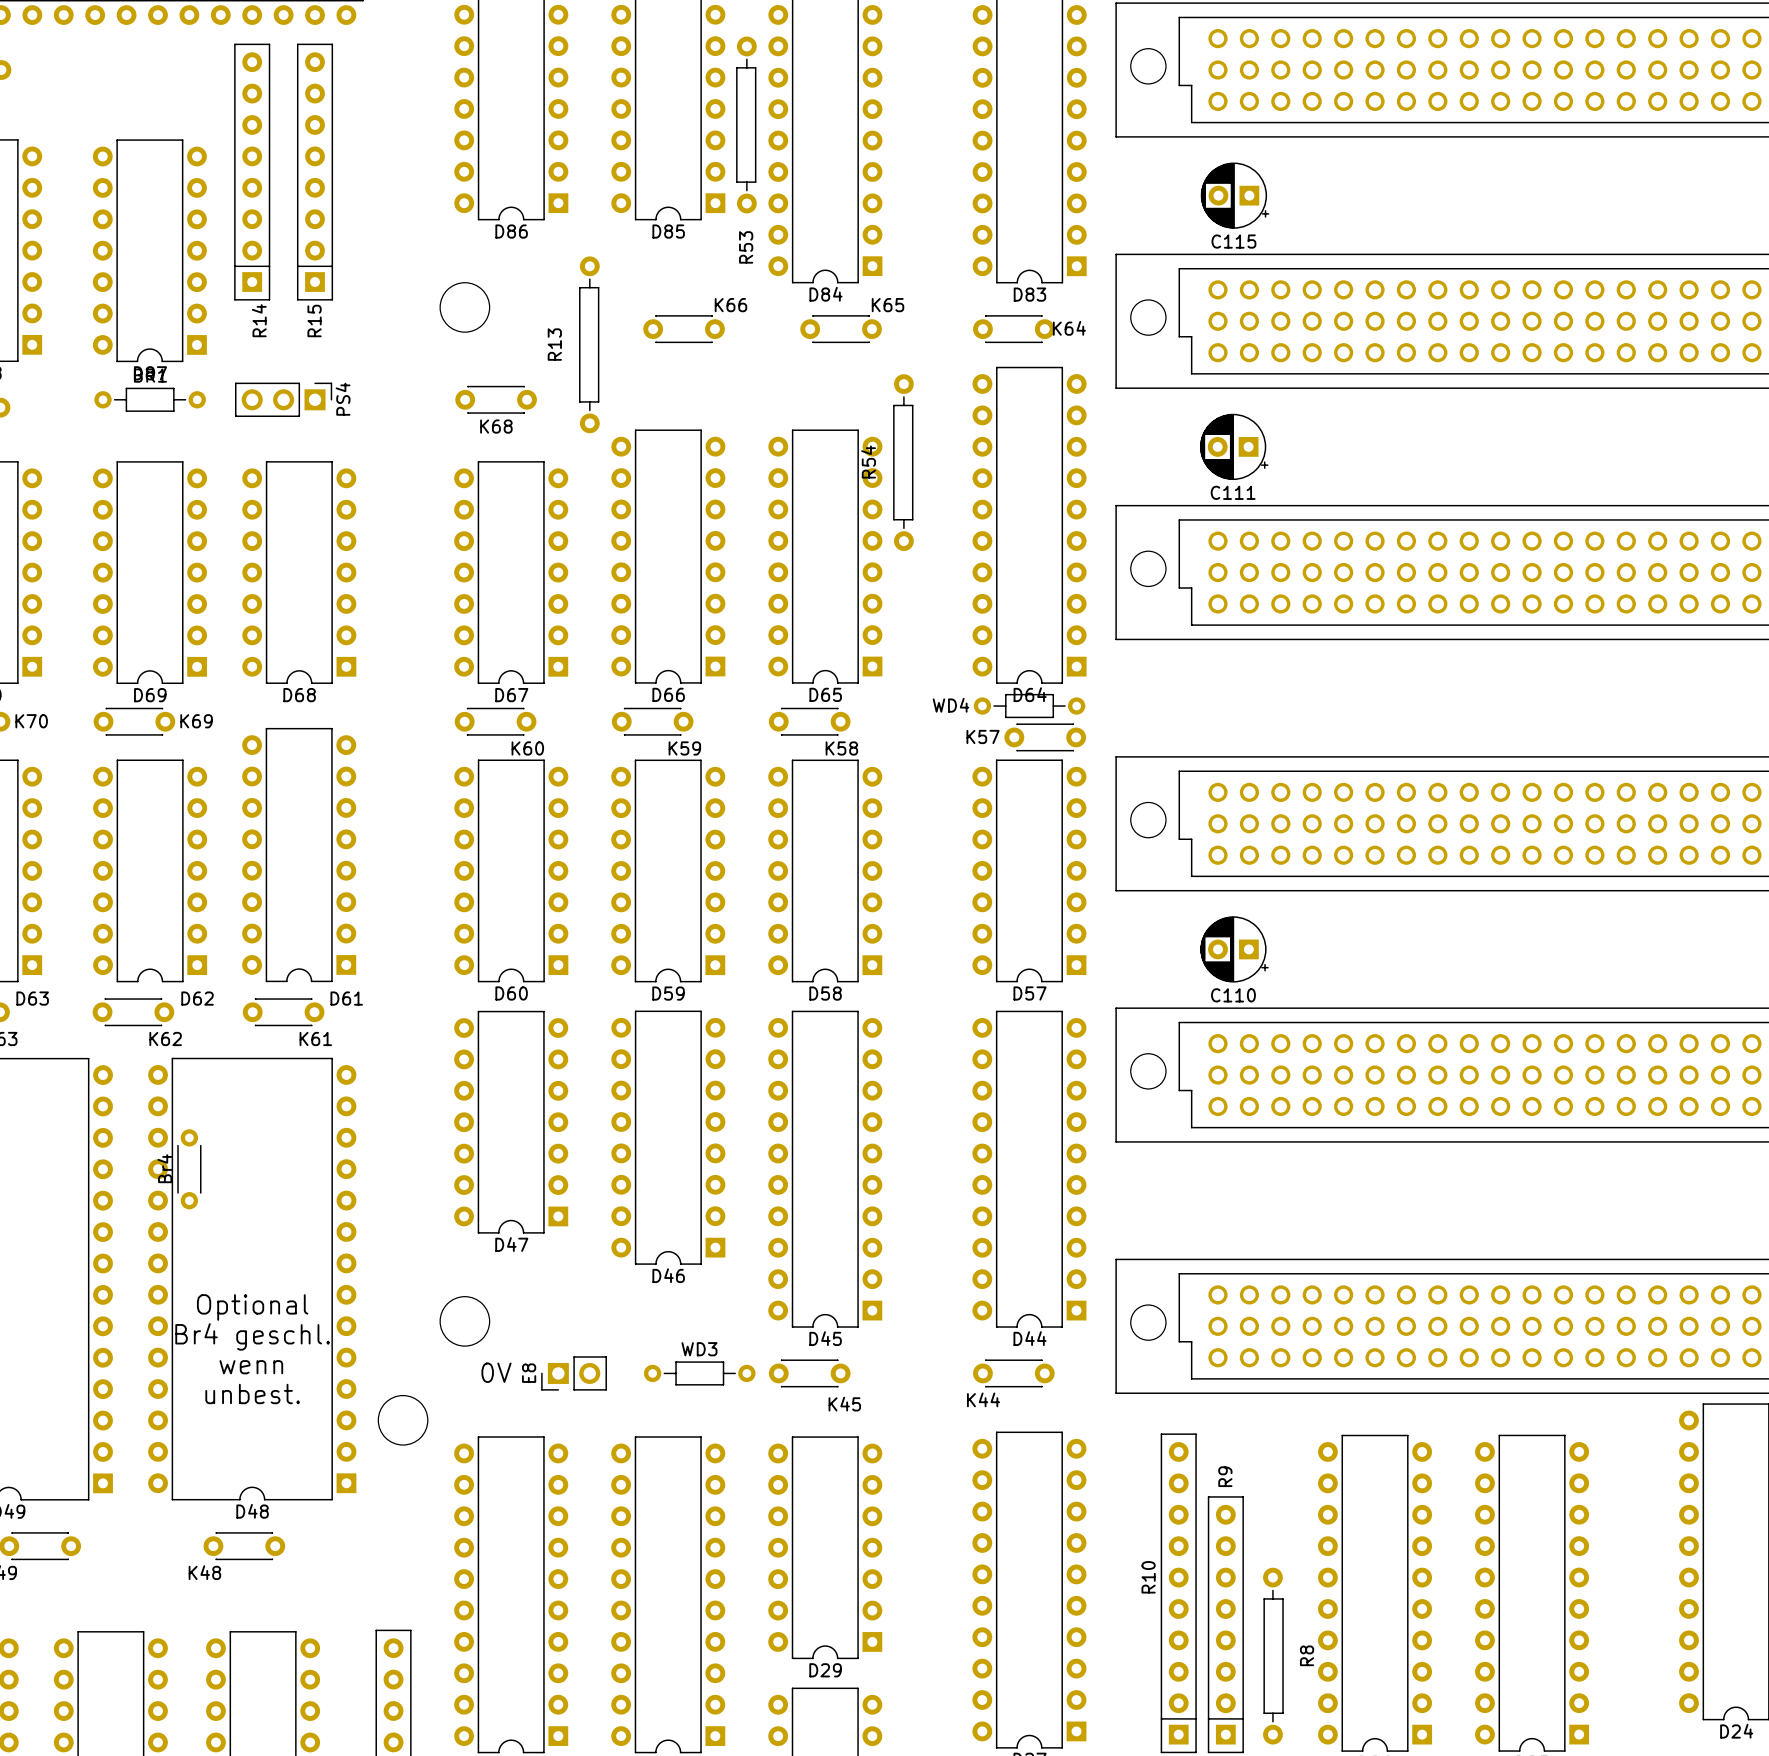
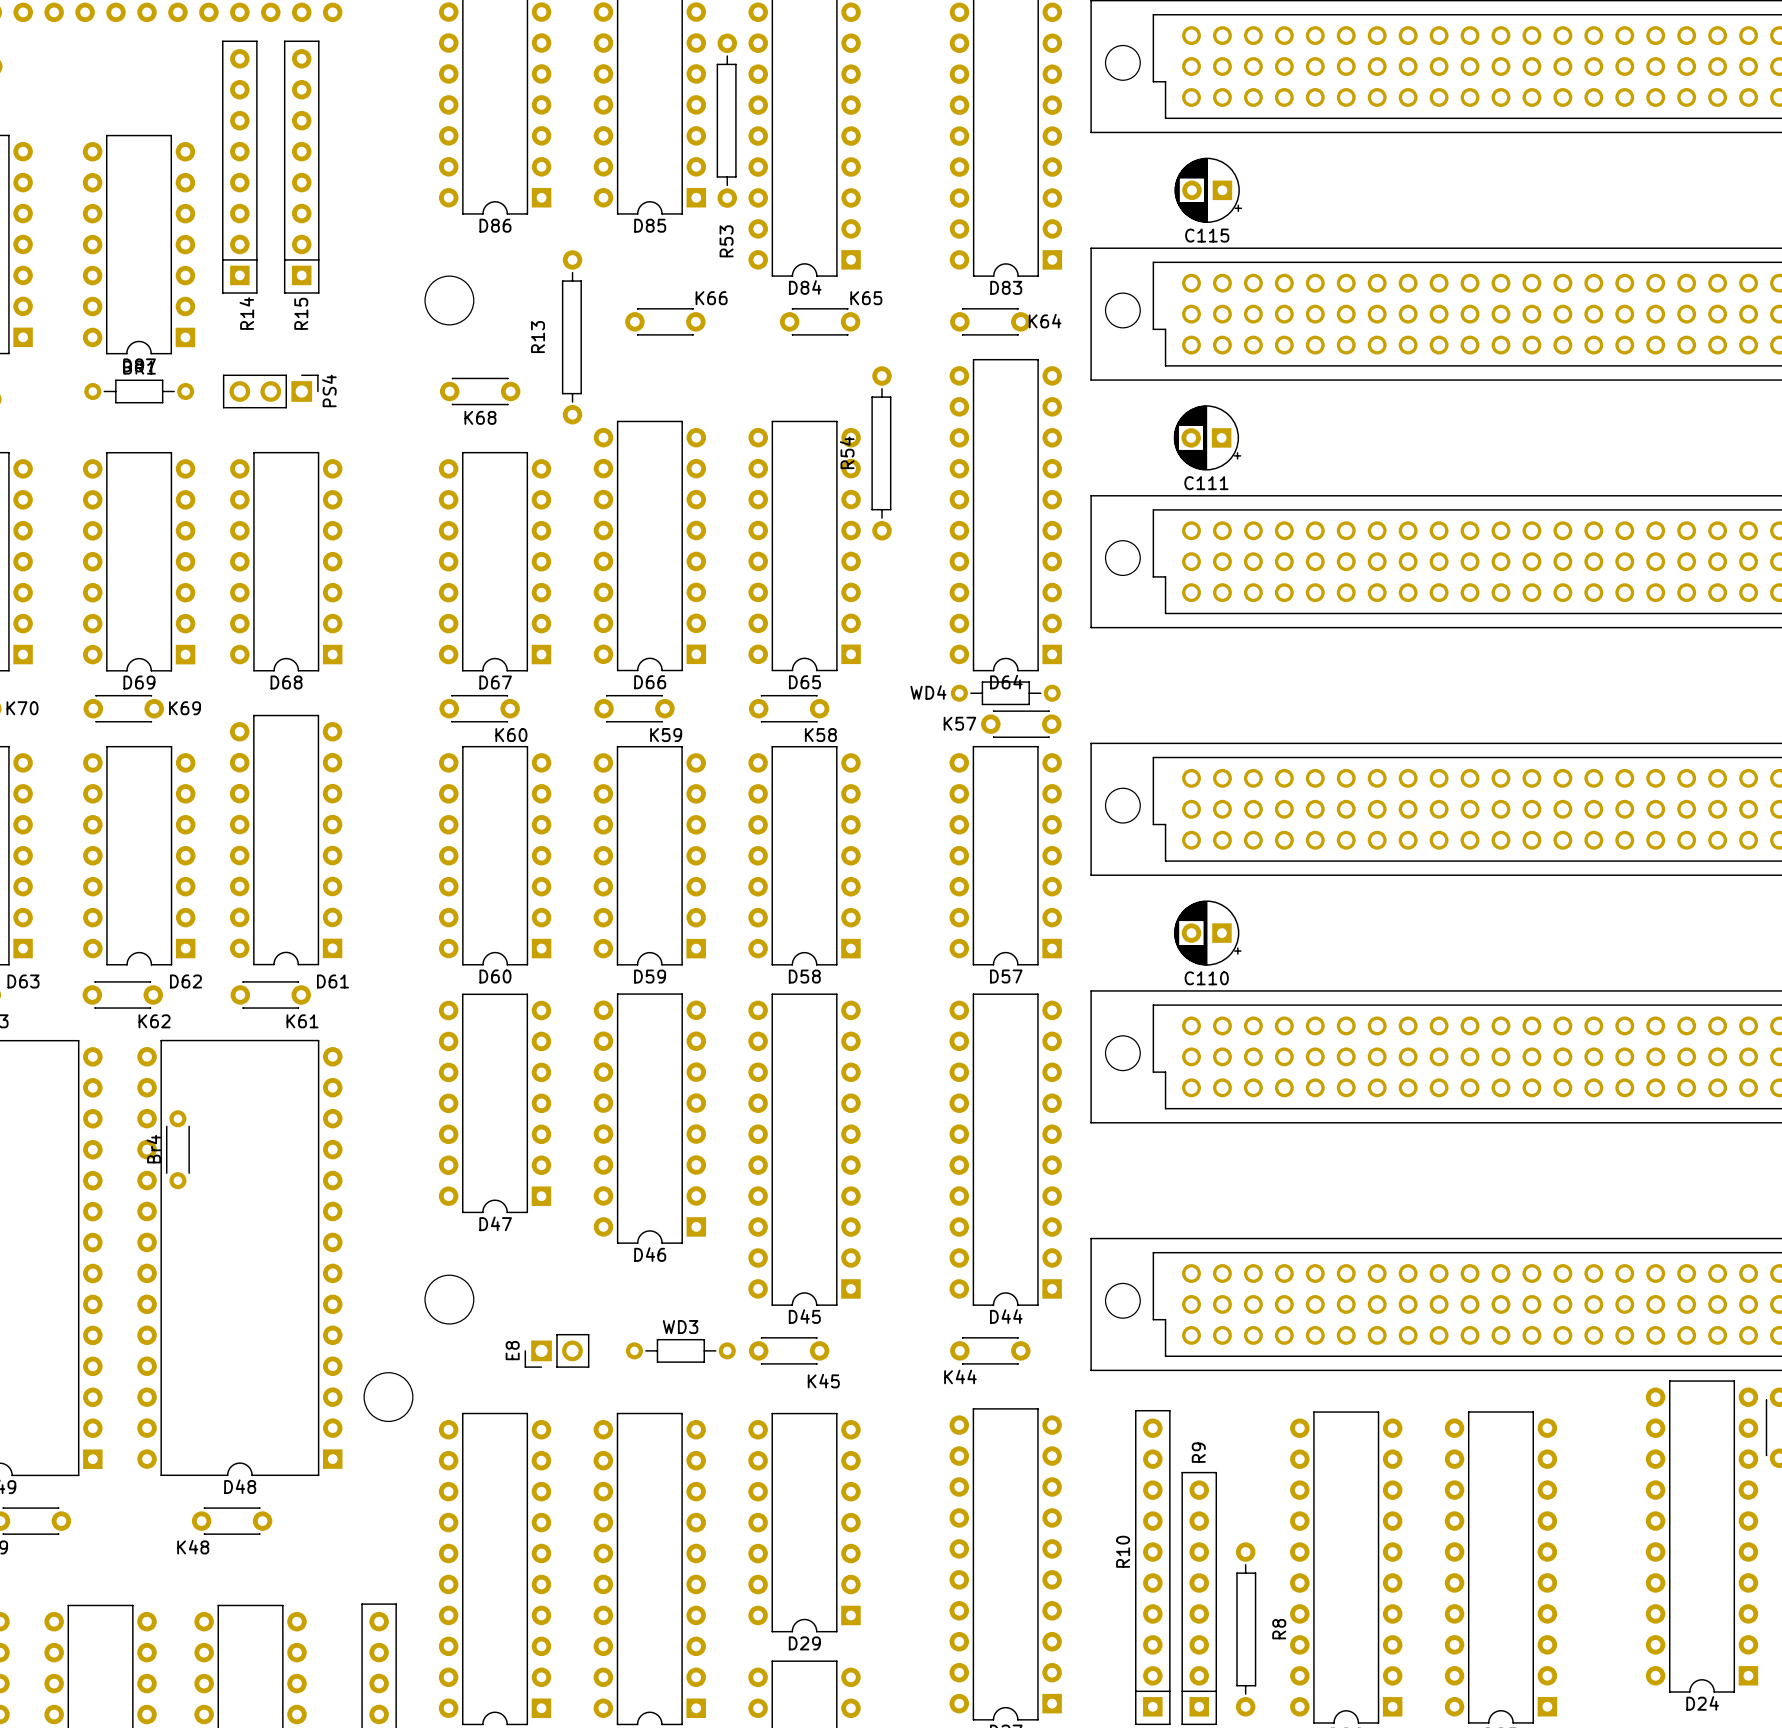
text: Optional (252, 1307) -> none
text: Br4 geschl. (252, 1336) -> none
text: wenn (251, 1367) -> none
text: 0V (496, 1372) -> none
text: unbest. (252, 1393) -> none

